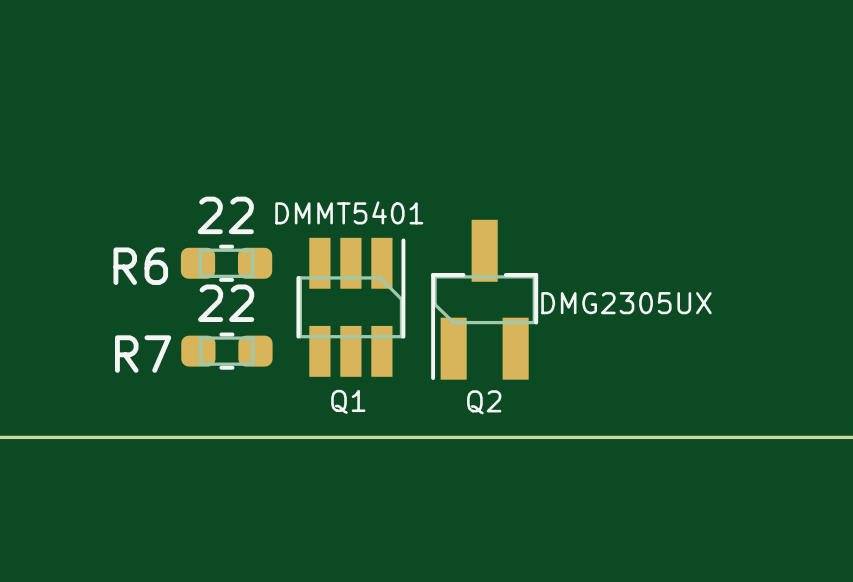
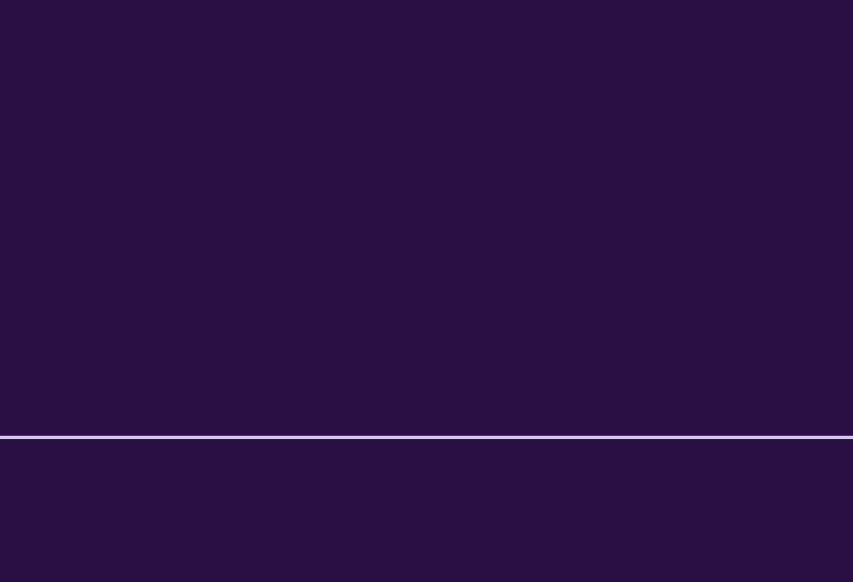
R6: 22 (226, 263) -> none
Q2: DMG2305UX (484, 299) -> none
Q1: DMMT5401 (350, 307) -> none
R7: 22 (226, 351) -> none

